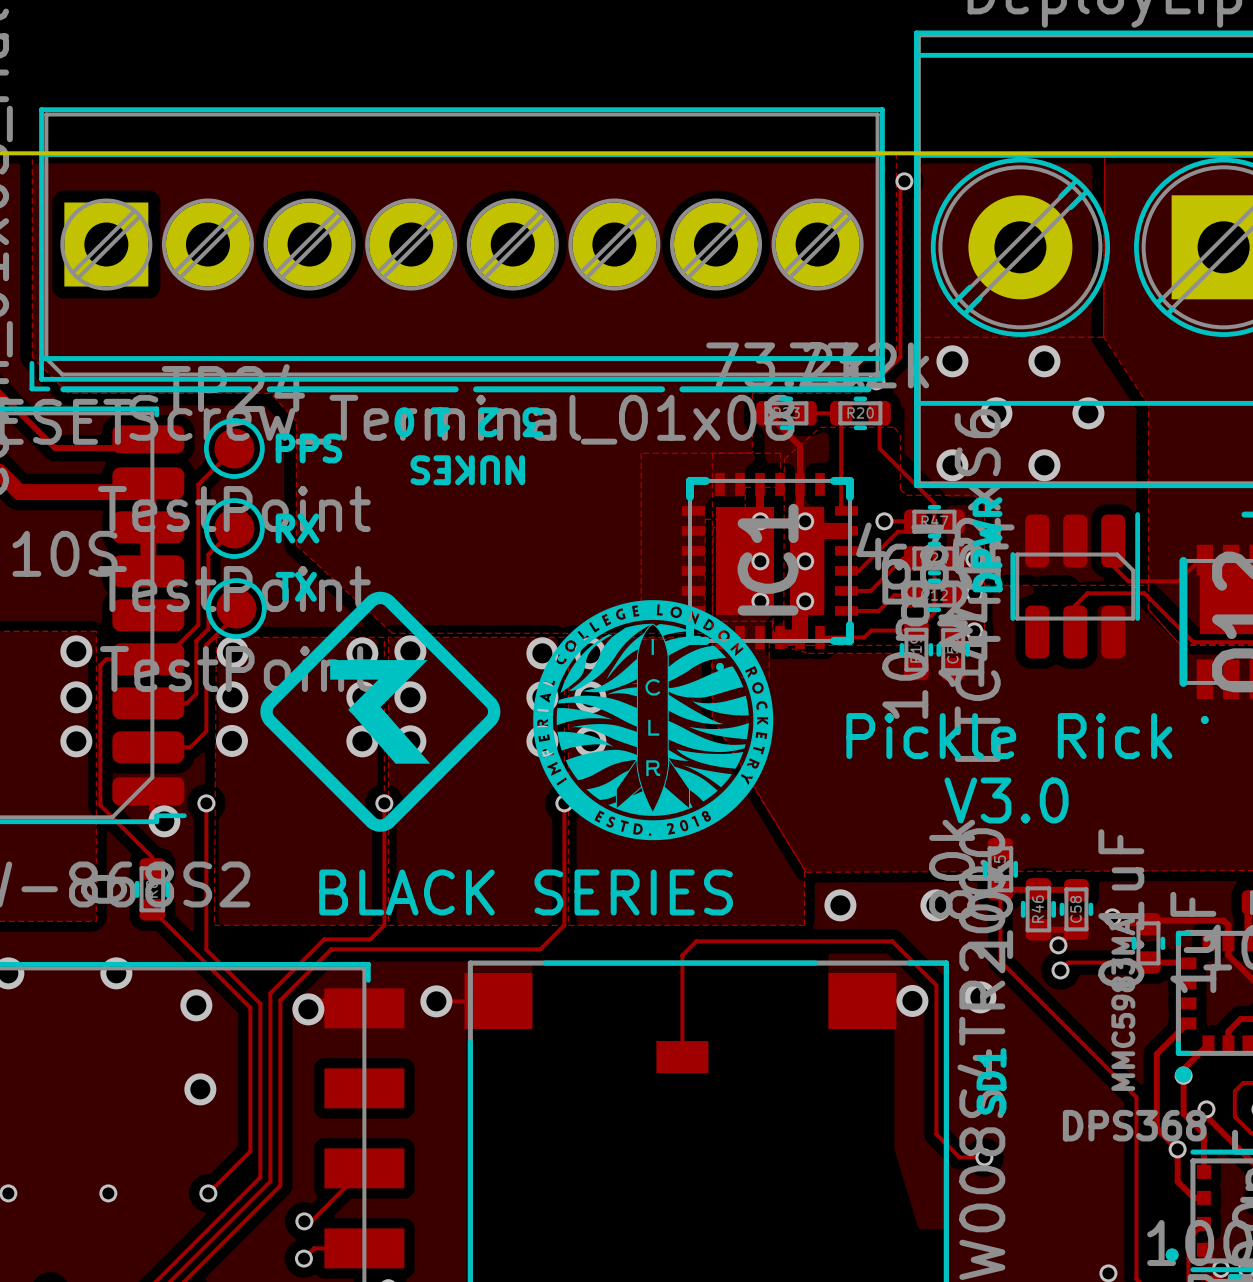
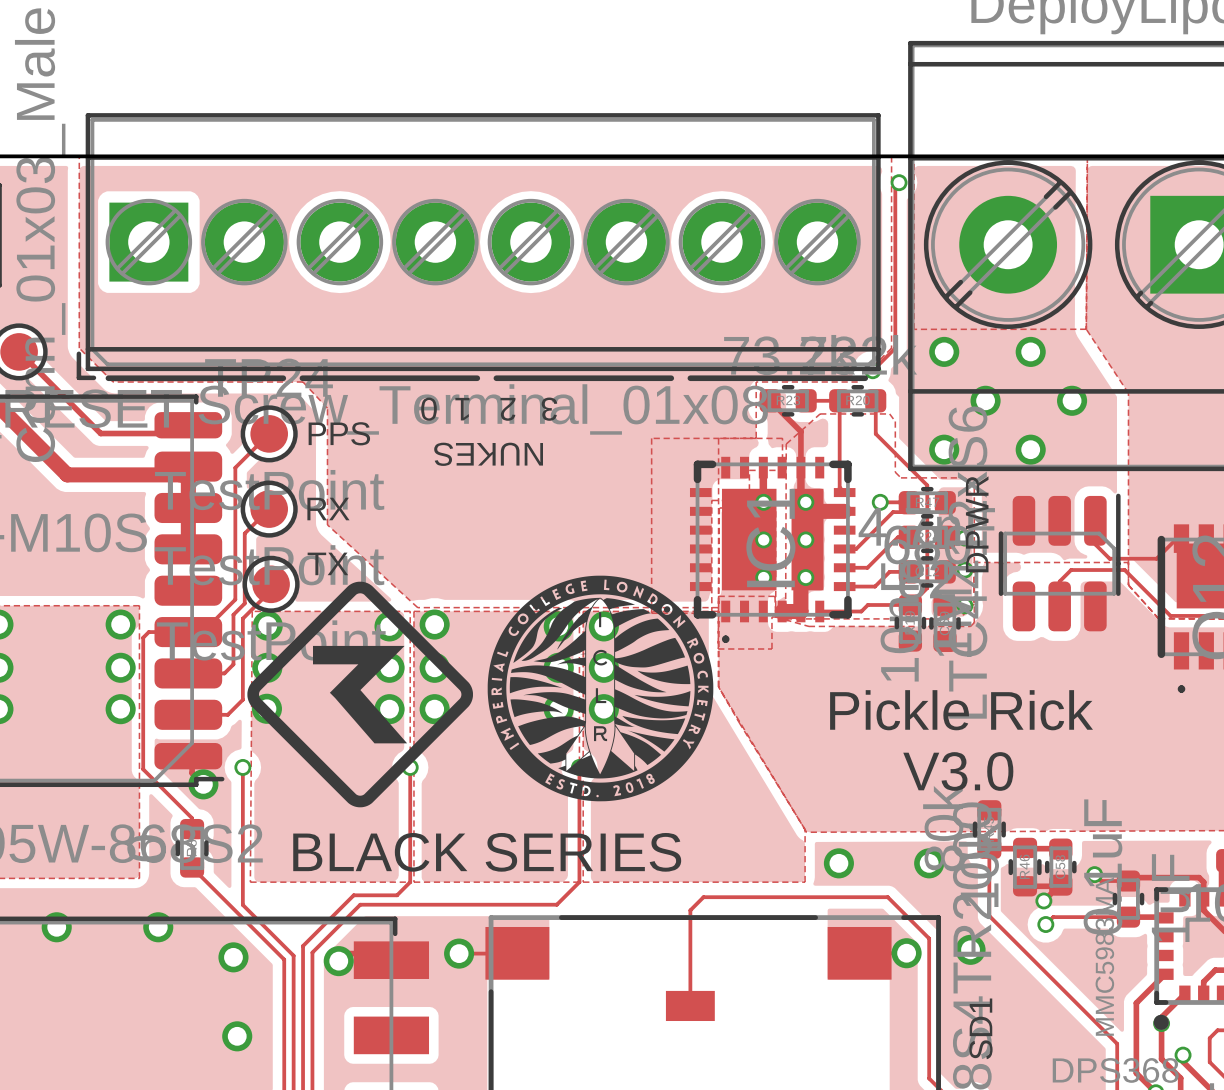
drawing position: (380, 711) -> (360, 694)
drawing position: (653, 720) -> (600, 688)
text position: Pickle Rick (1009, 736) -> Pickle Rick (961, 710)
text position: V3.0 (1006, 800) -> V3.0 (958, 771)
text position: BLACK SERIES (526, 892) -> BLACK SERIES (487, 852)

